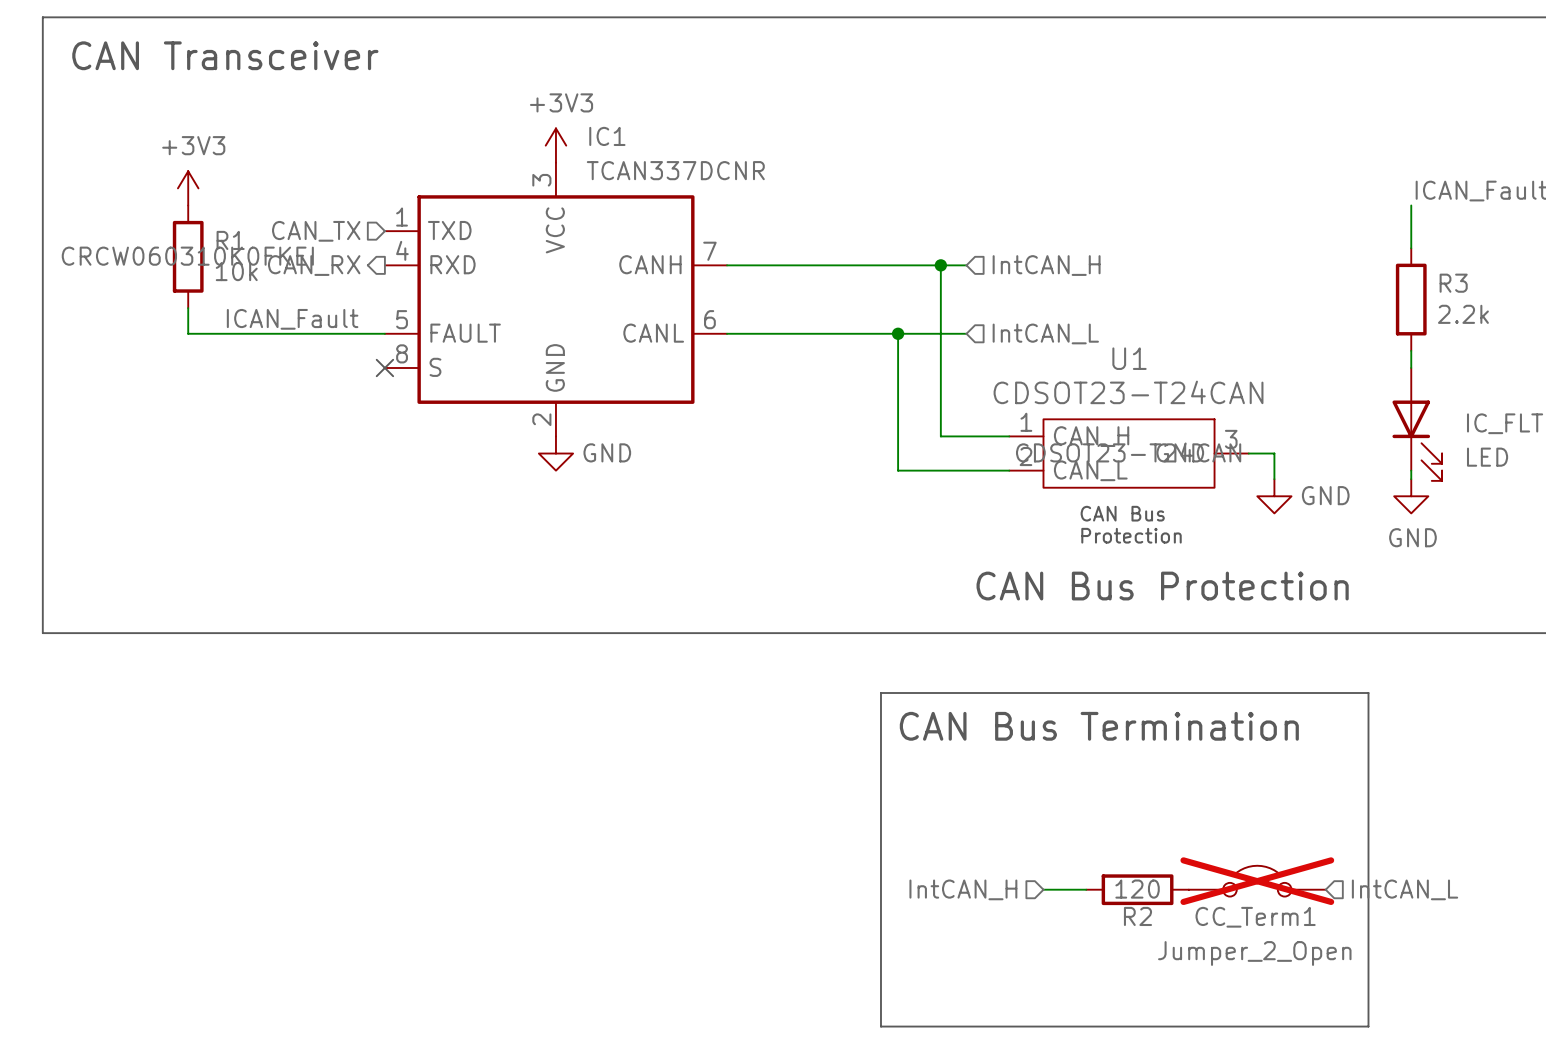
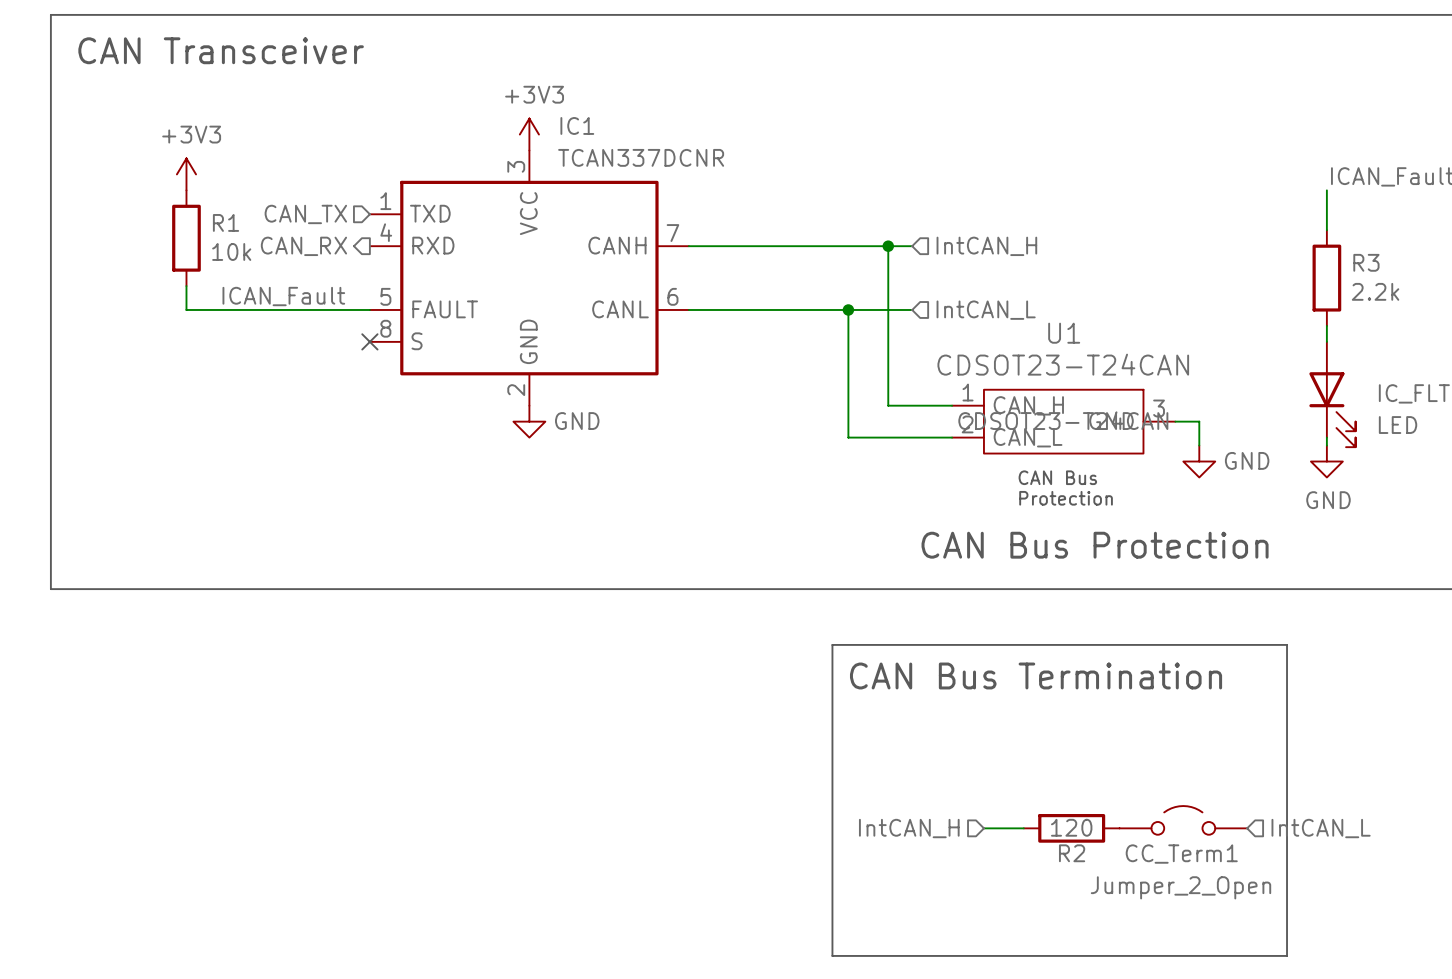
R1 text: CRCW060310K0FKEI (187, 256) -> none
CC_Term1 do-not-place cross: (1257, 881) -> none

